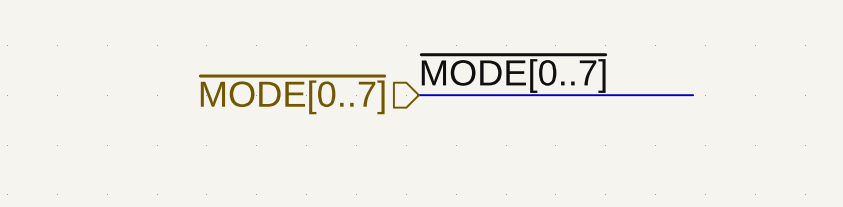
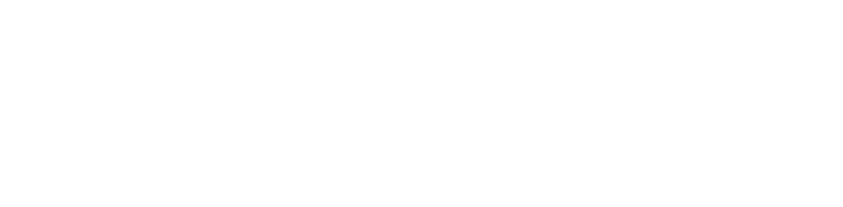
label: ~{MODE[0..7]} (513, 73) -> none
hierarchical label: ~{MODE[0..7]} (292, 95) -> none
bus: (418, 95) (693, 95) -> none

